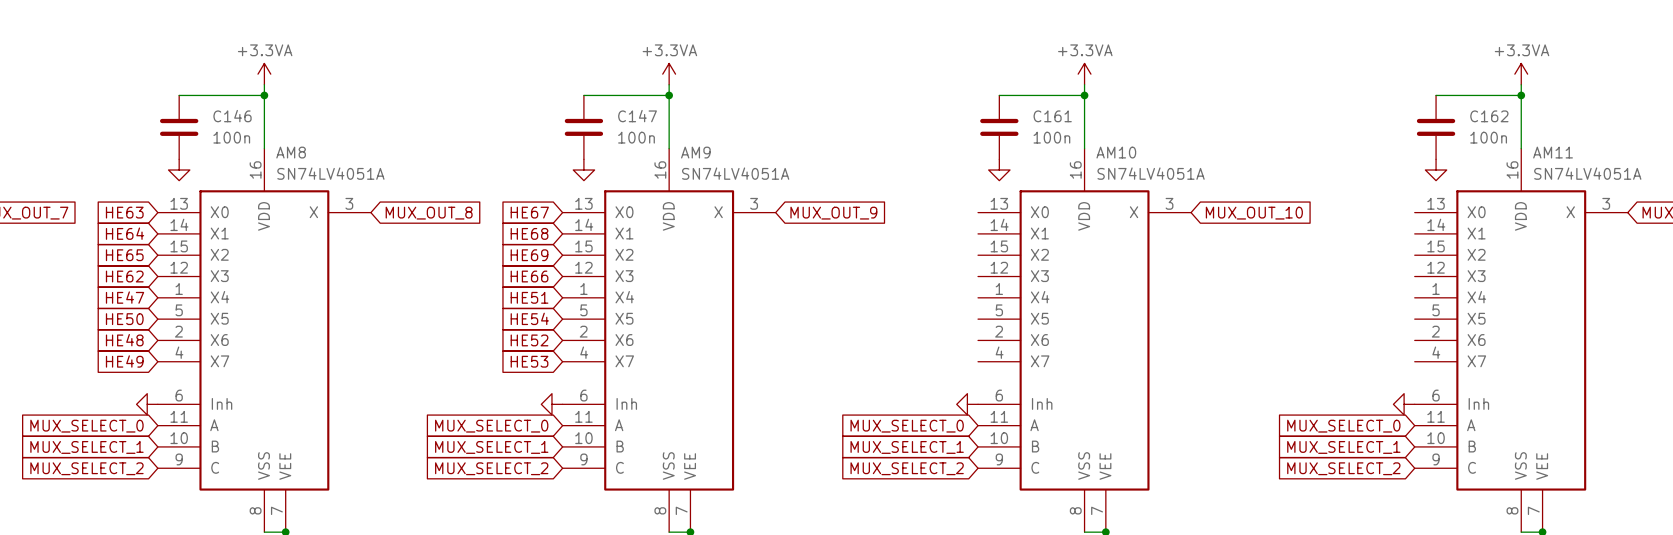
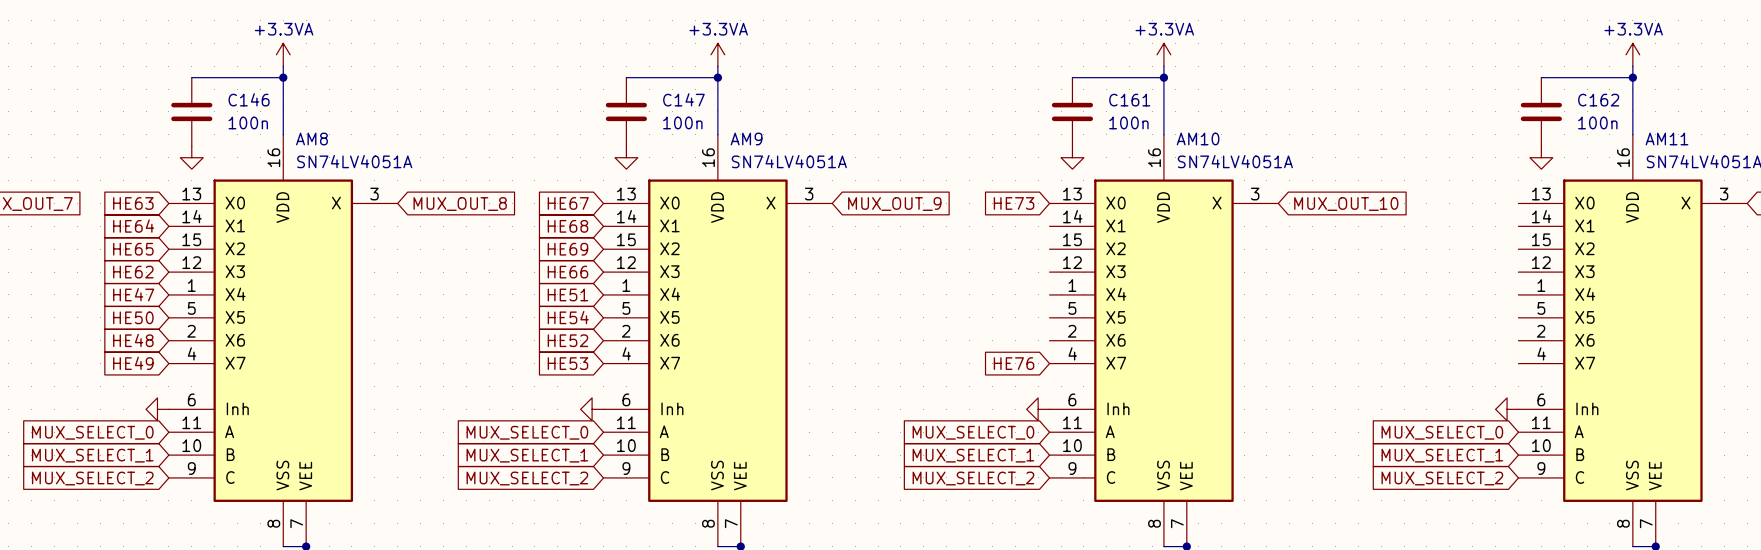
global label: none -> HE73 (1014, 203)
global label: none -> HE76 (1014, 363)

